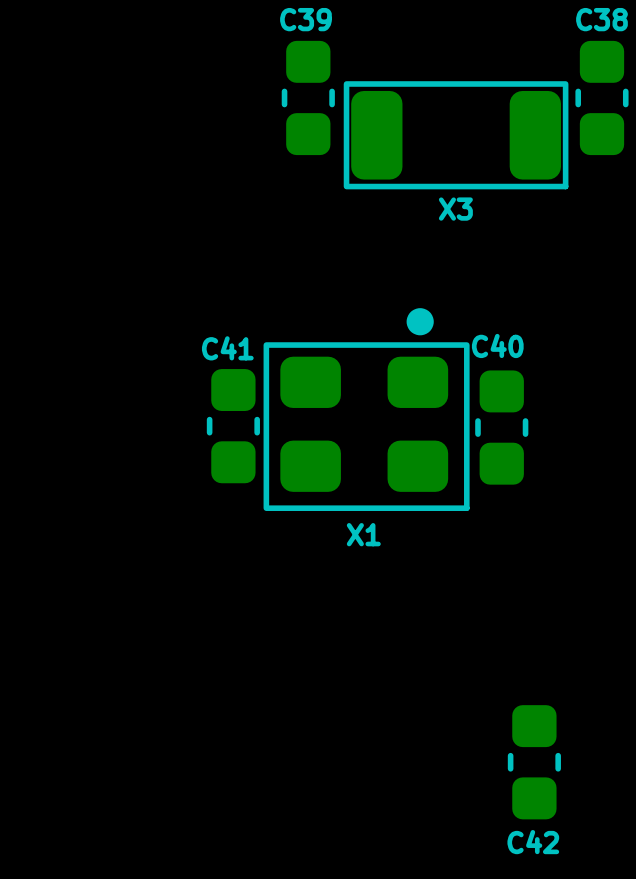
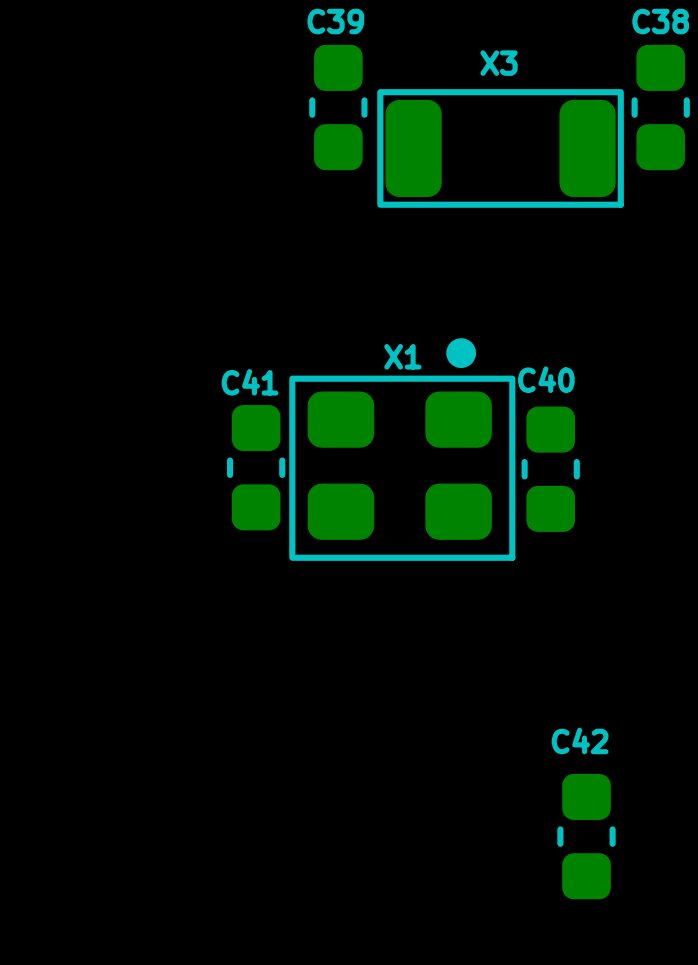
X3 name position: X3 (455, 209) -> X3 (499, 63)
X1 name position: X1 (363, 534) -> X1 (402, 356)
C42 name position: C42 (533, 842) -> C42 (580, 740)

